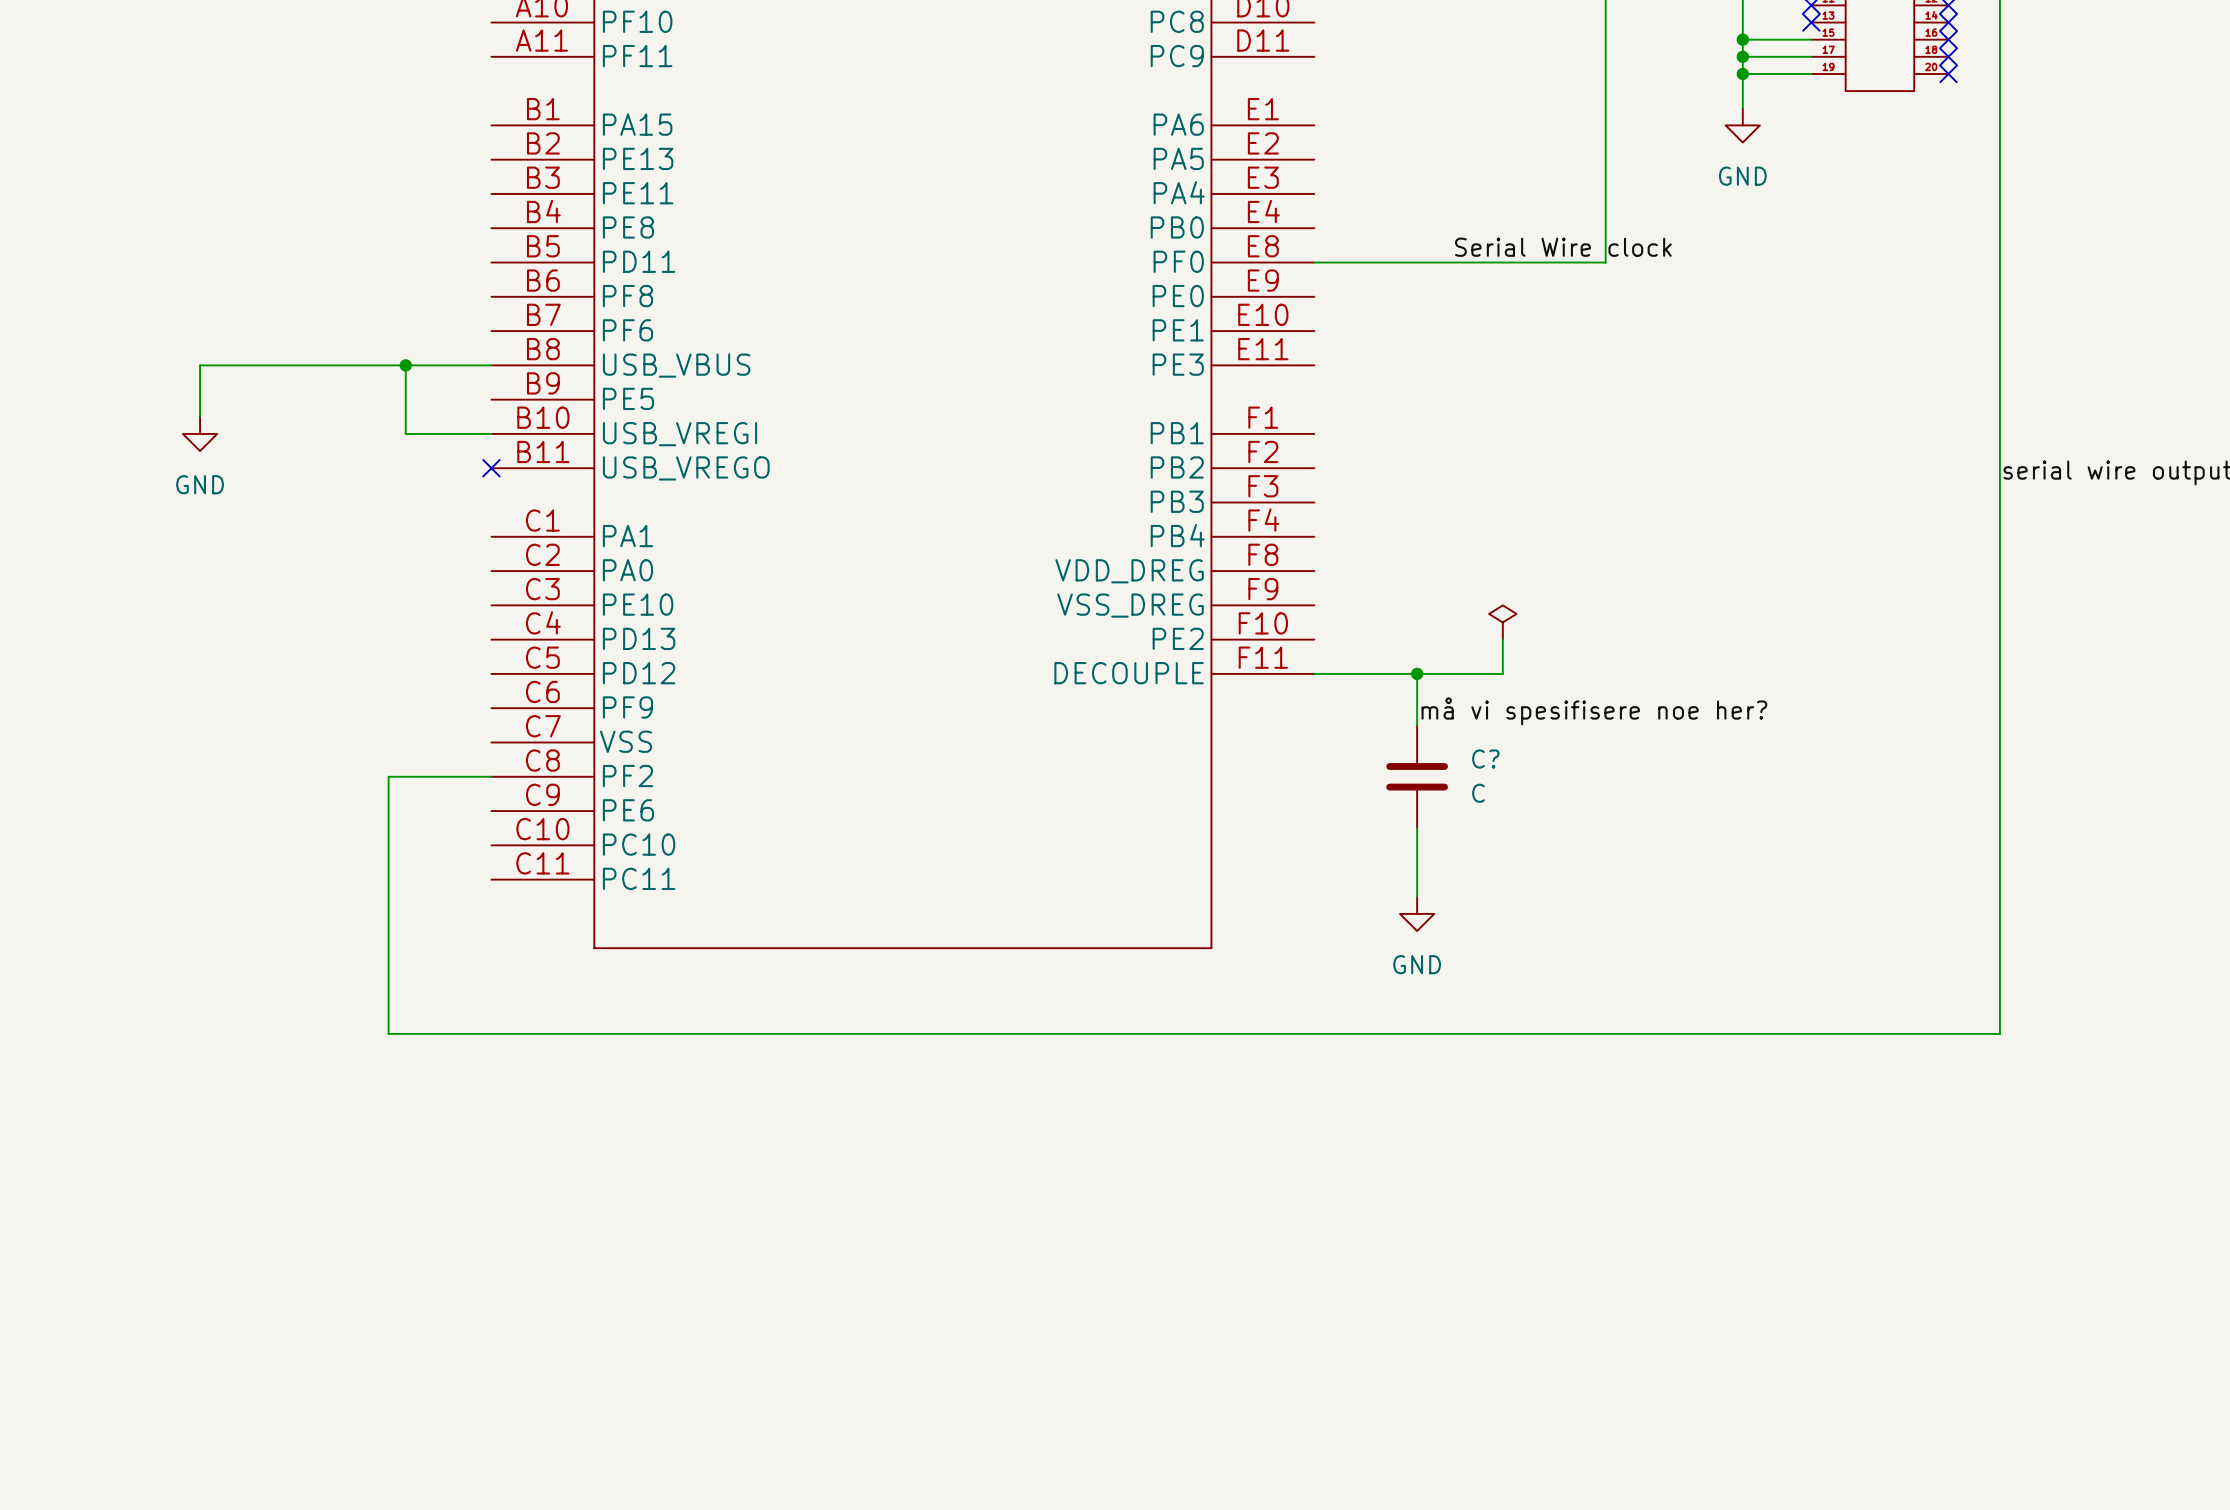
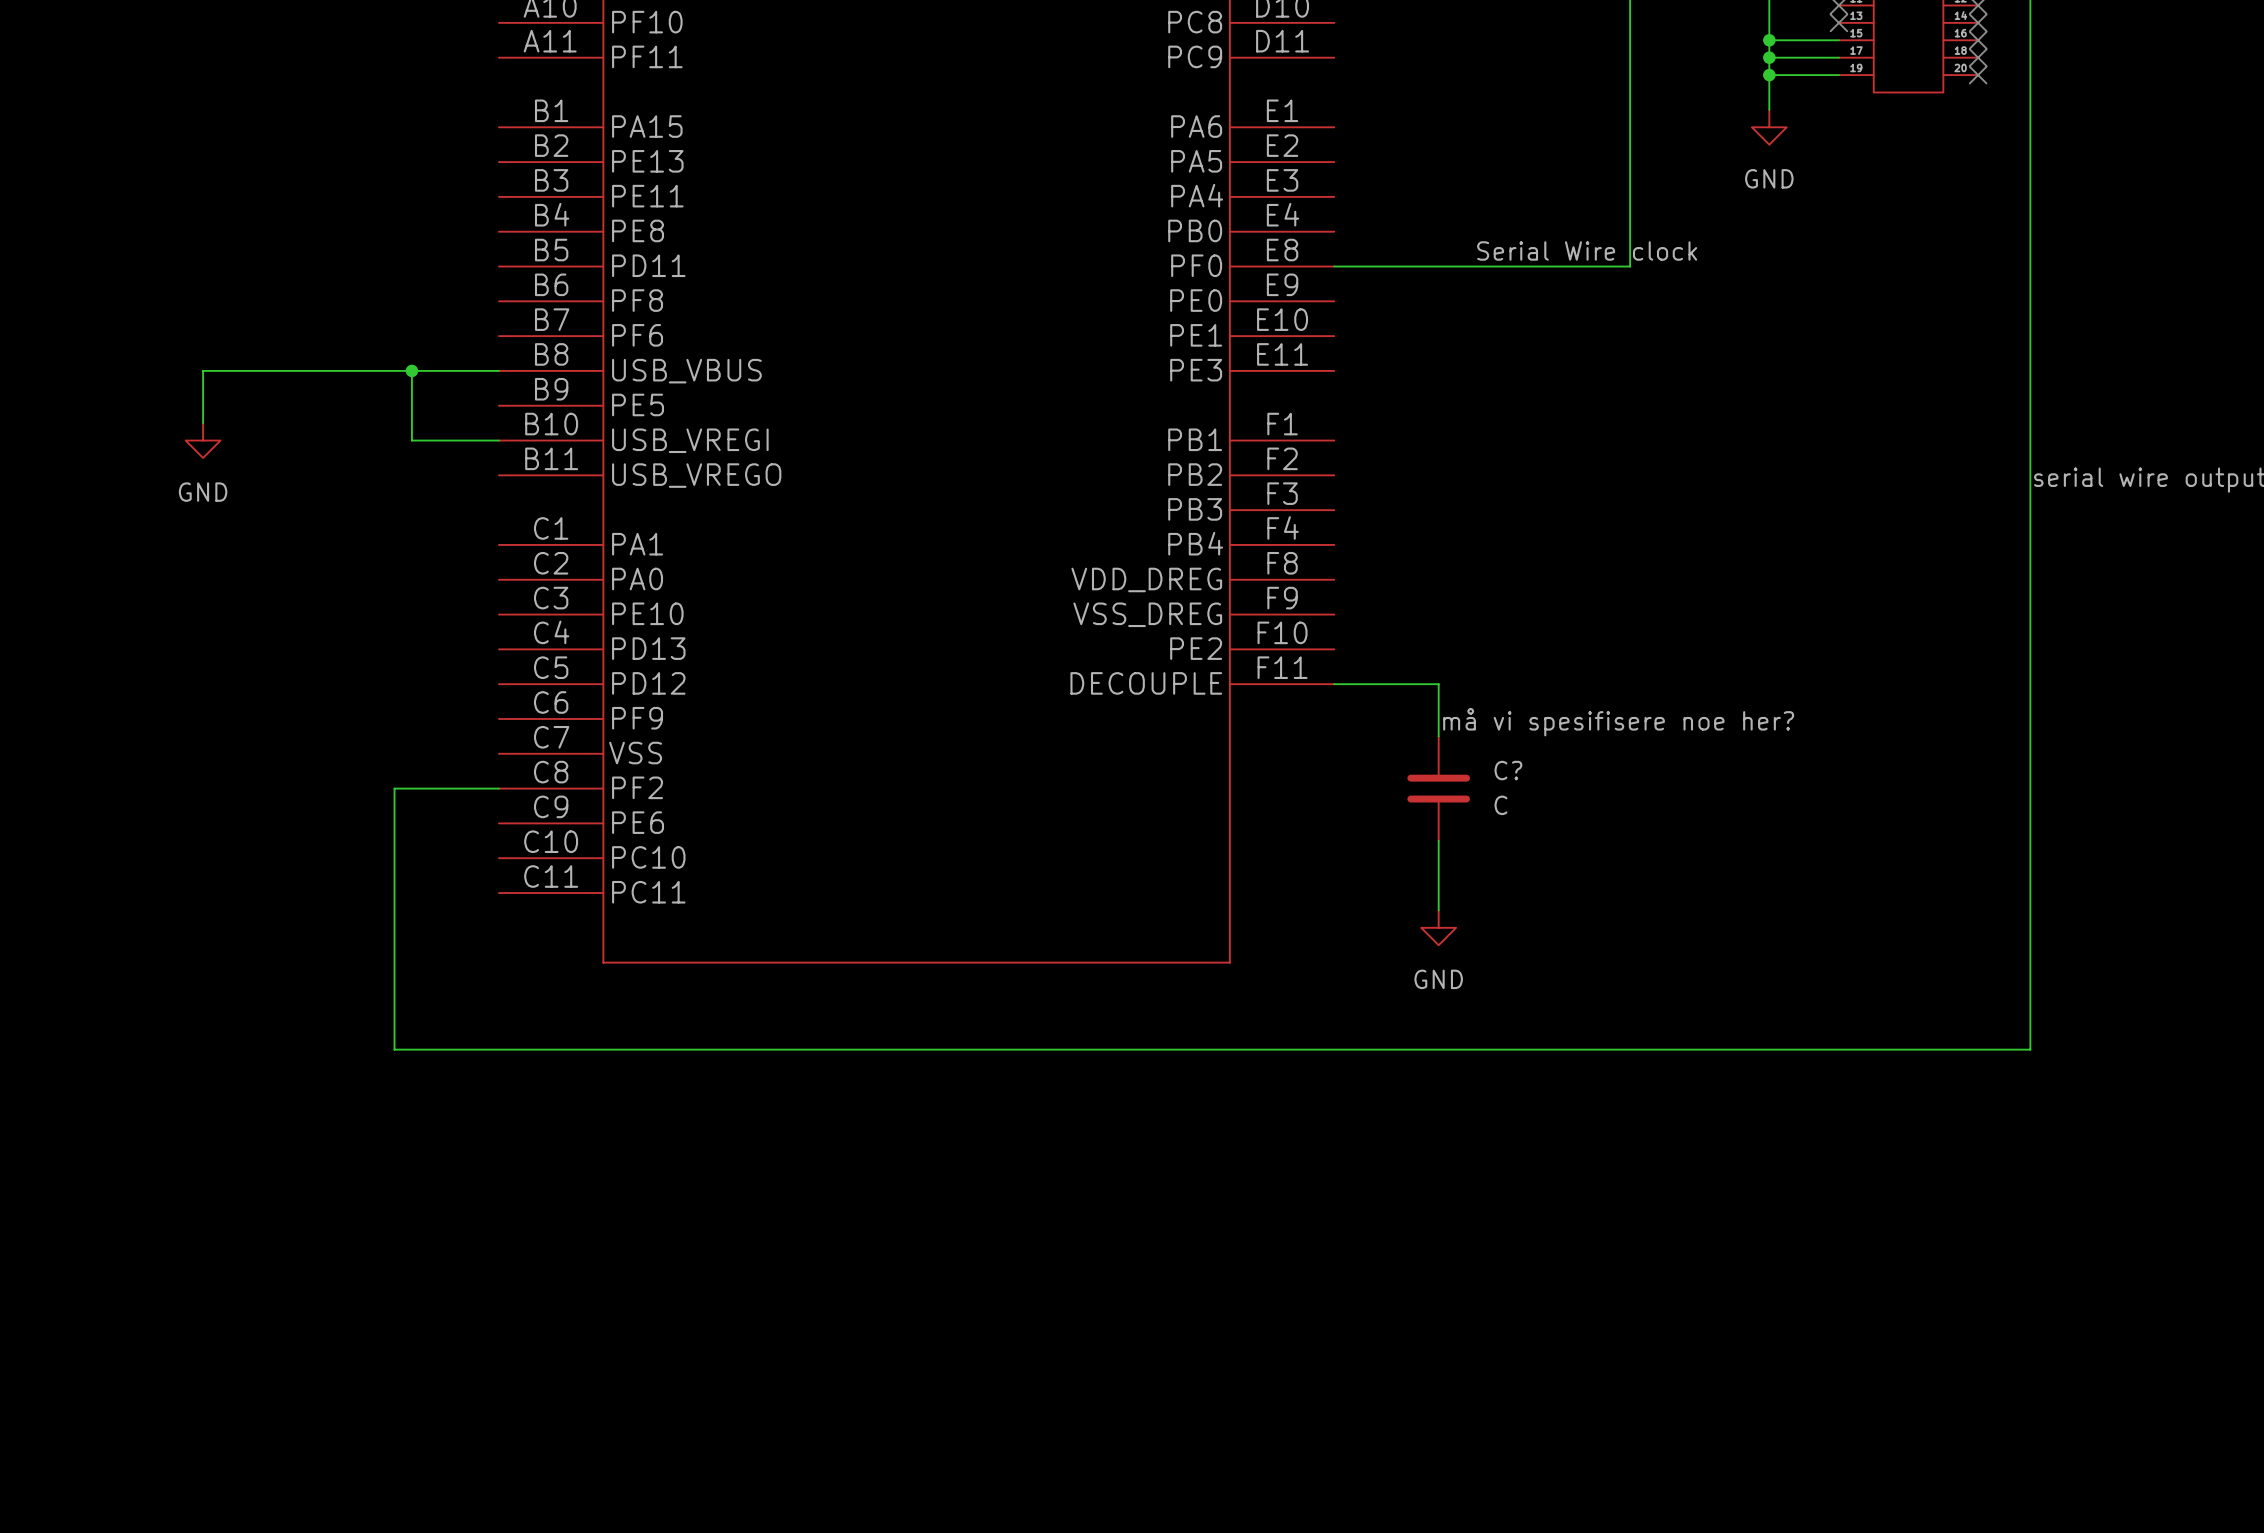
no-connect mark: (491, 468) -> none
power symbol: (1502, 622) -> none
wire: (1502, 639) (1502, 673) (1417, 673) -> none
junction: (1417, 673) -> none

